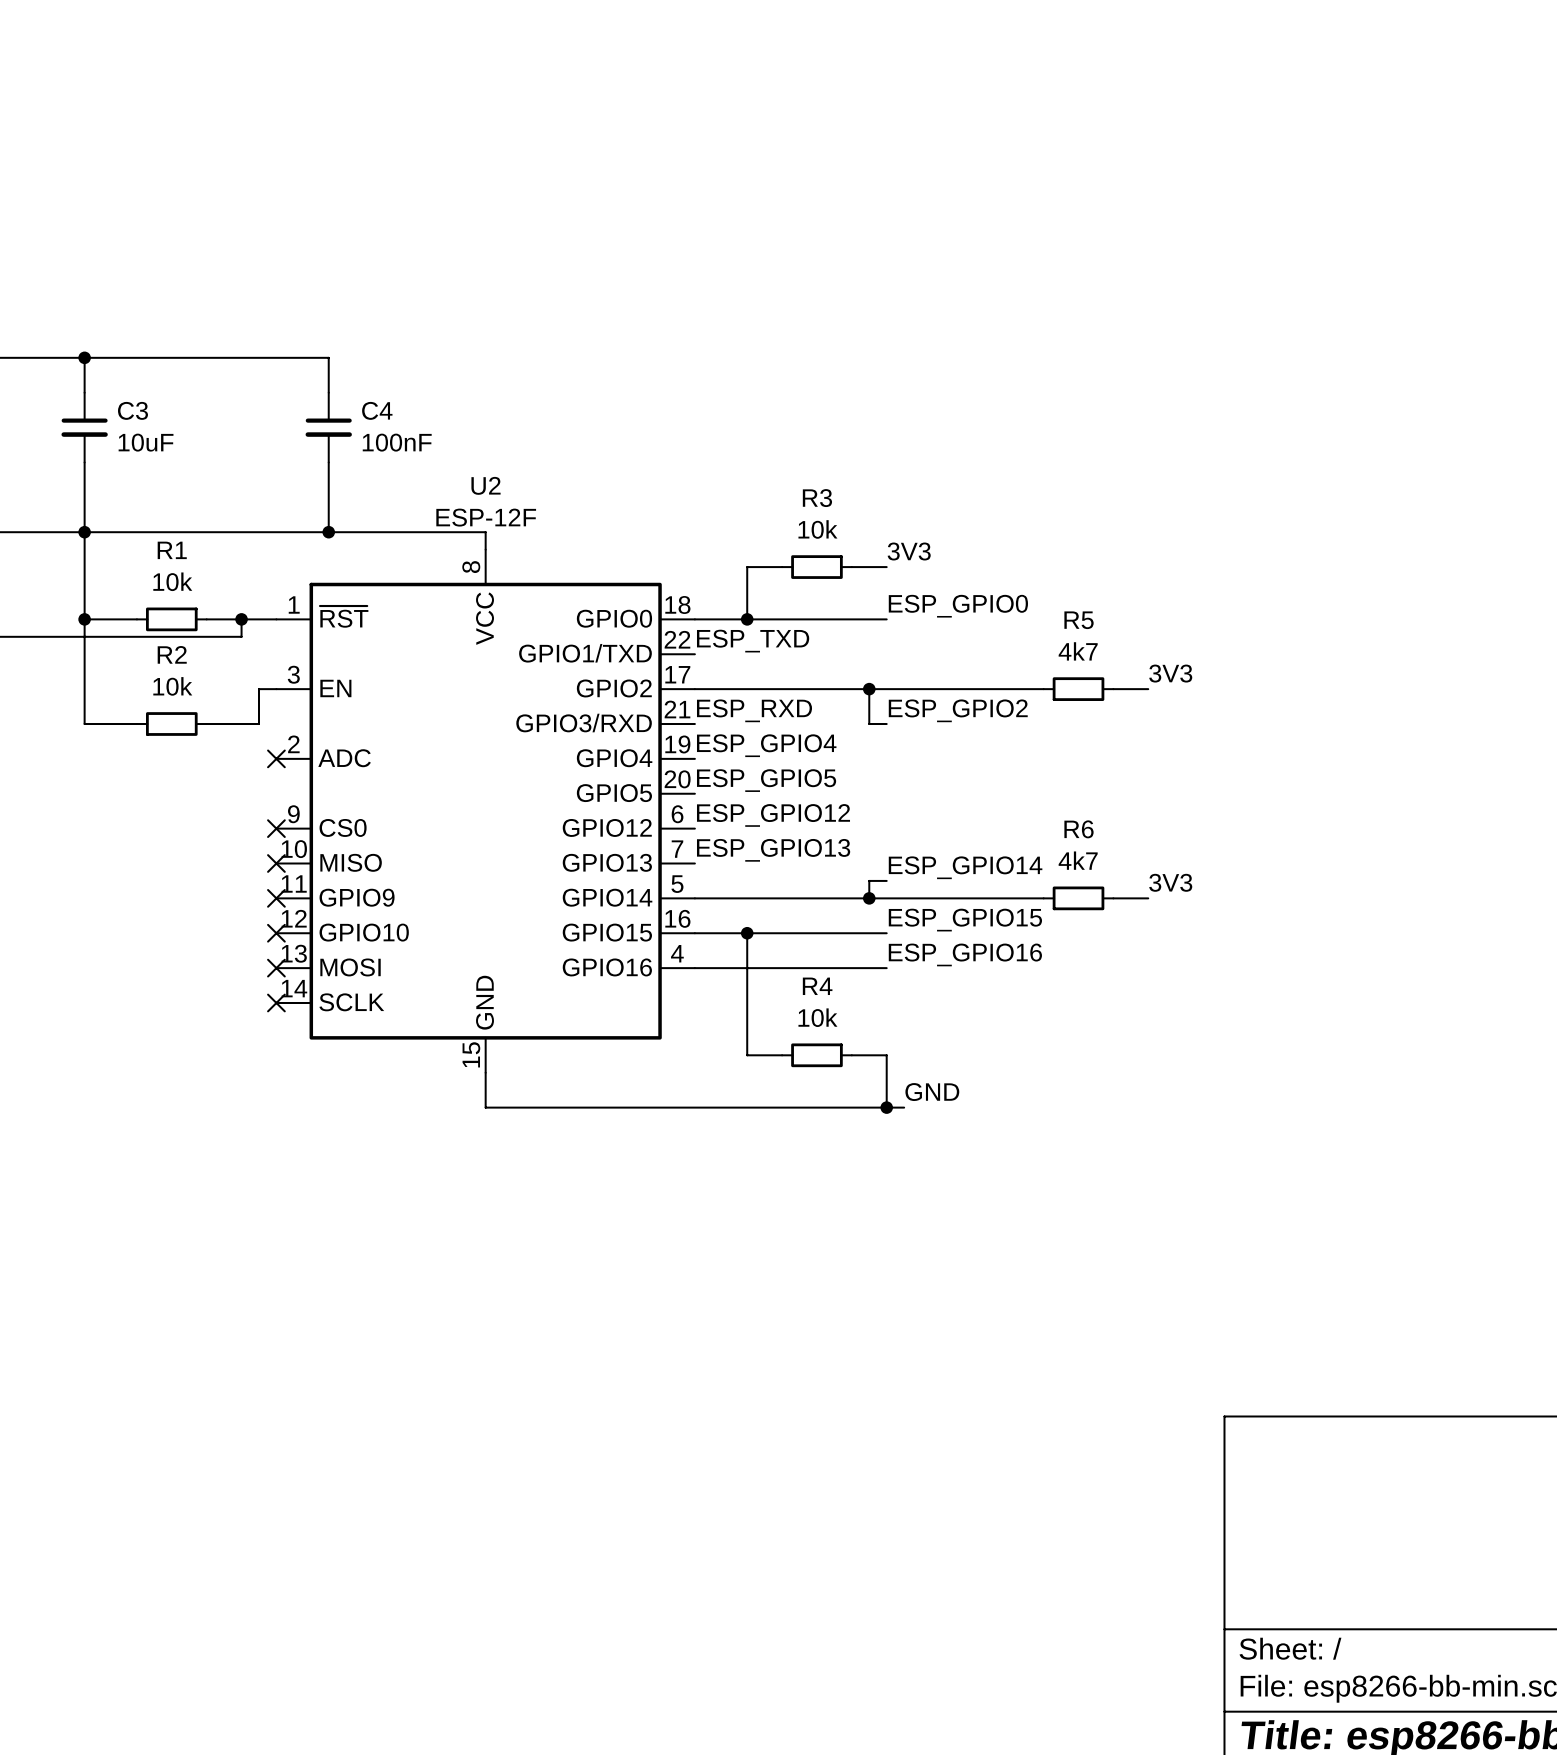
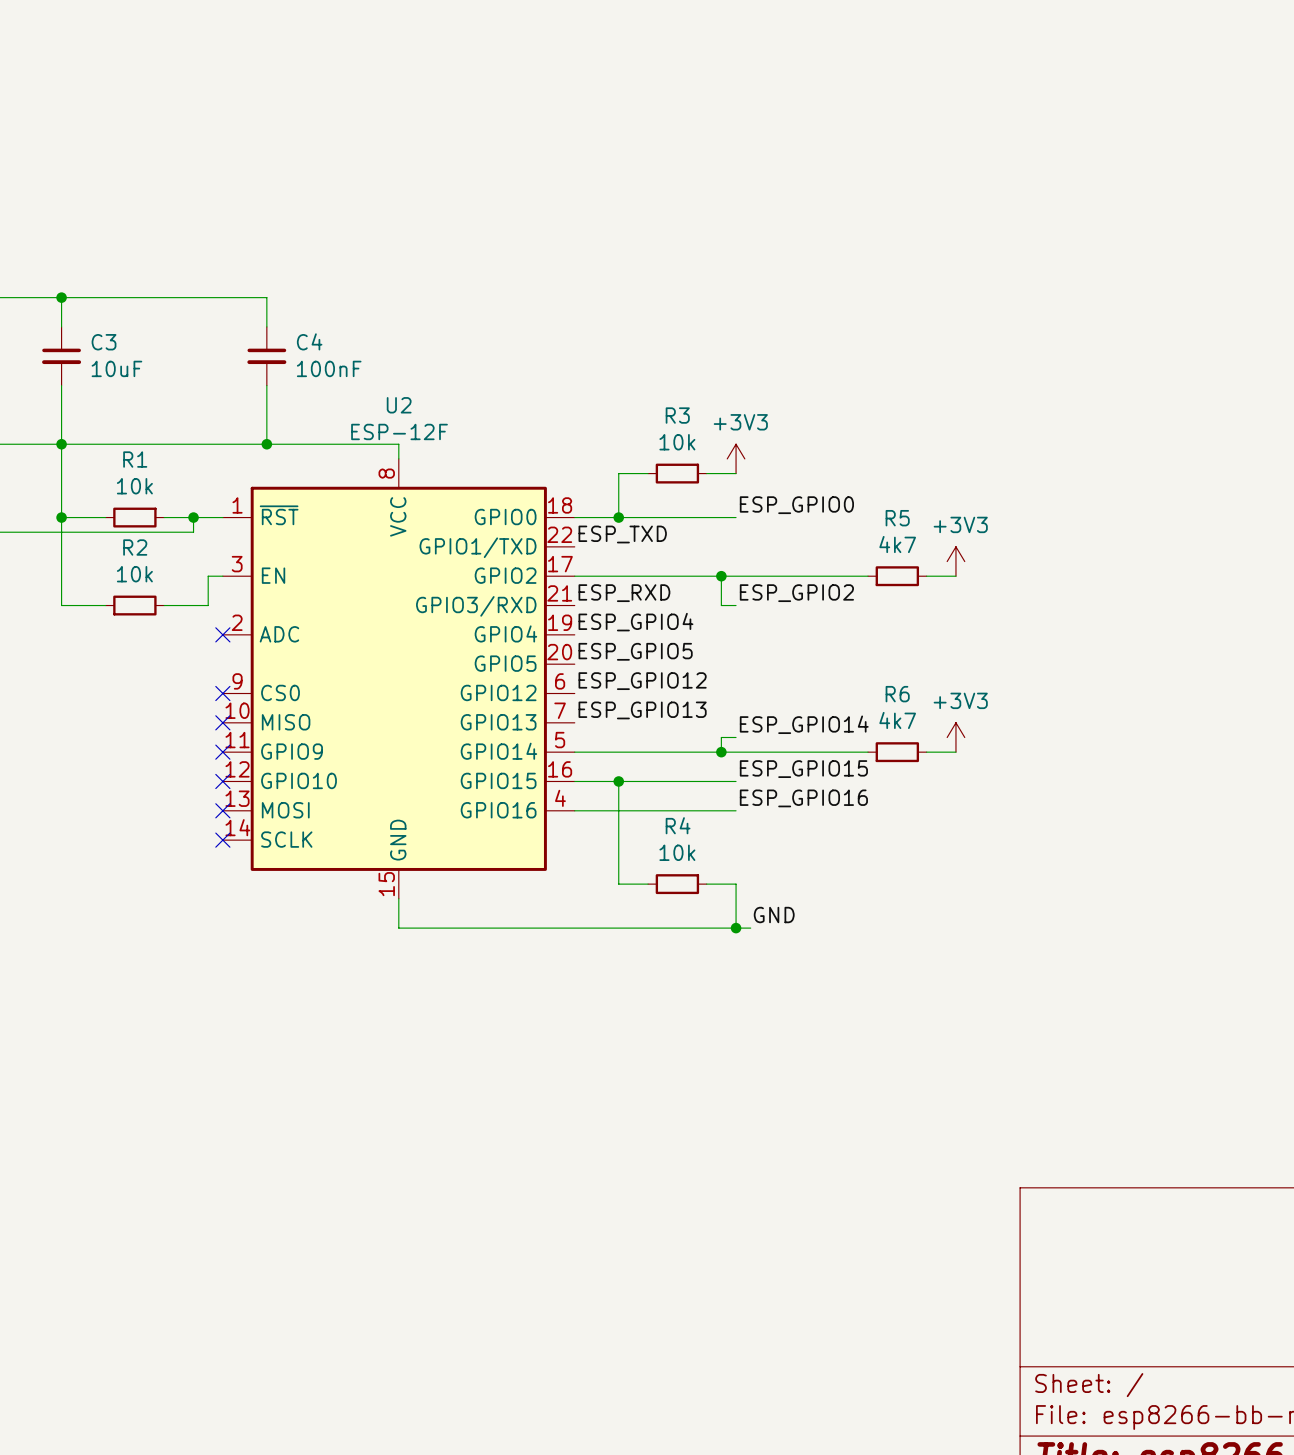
power symbol: none -> +3V3 (736, 458)
label: 3V3 (909, 551) -> none
power symbol: none -> +3V3 (955, 561)
label: 3V3 (1170, 673) -> none
power symbol: none -> +3V3 (955, 737)
label: 3V3 (1170, 882) -> none

